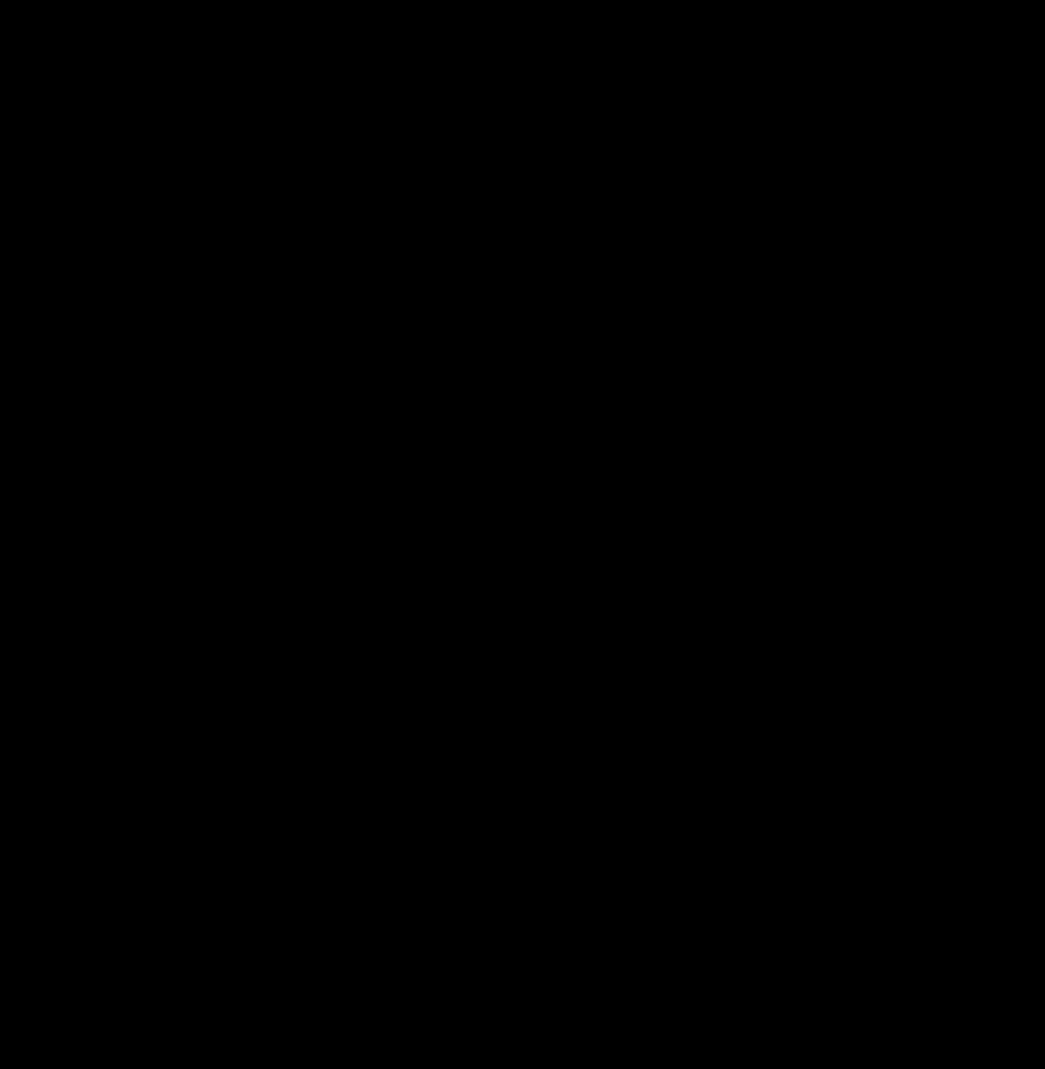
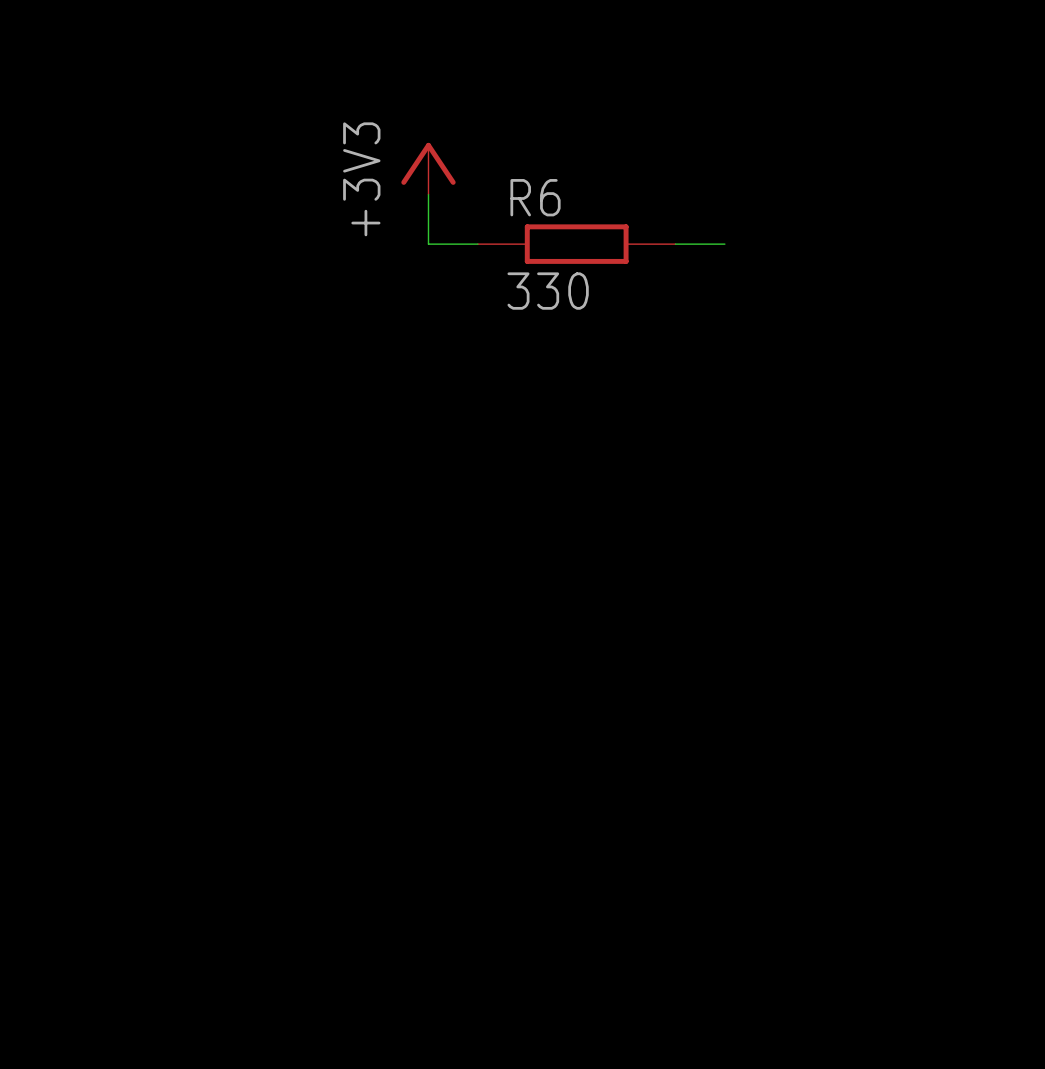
power symbol: none -> +3V3 (428, 168)
wire: none -> (428, 194) (428, 244) (477, 244)
R6: none -> 330 (576, 244)
wire: none -> (675, 244) (724, 244)

